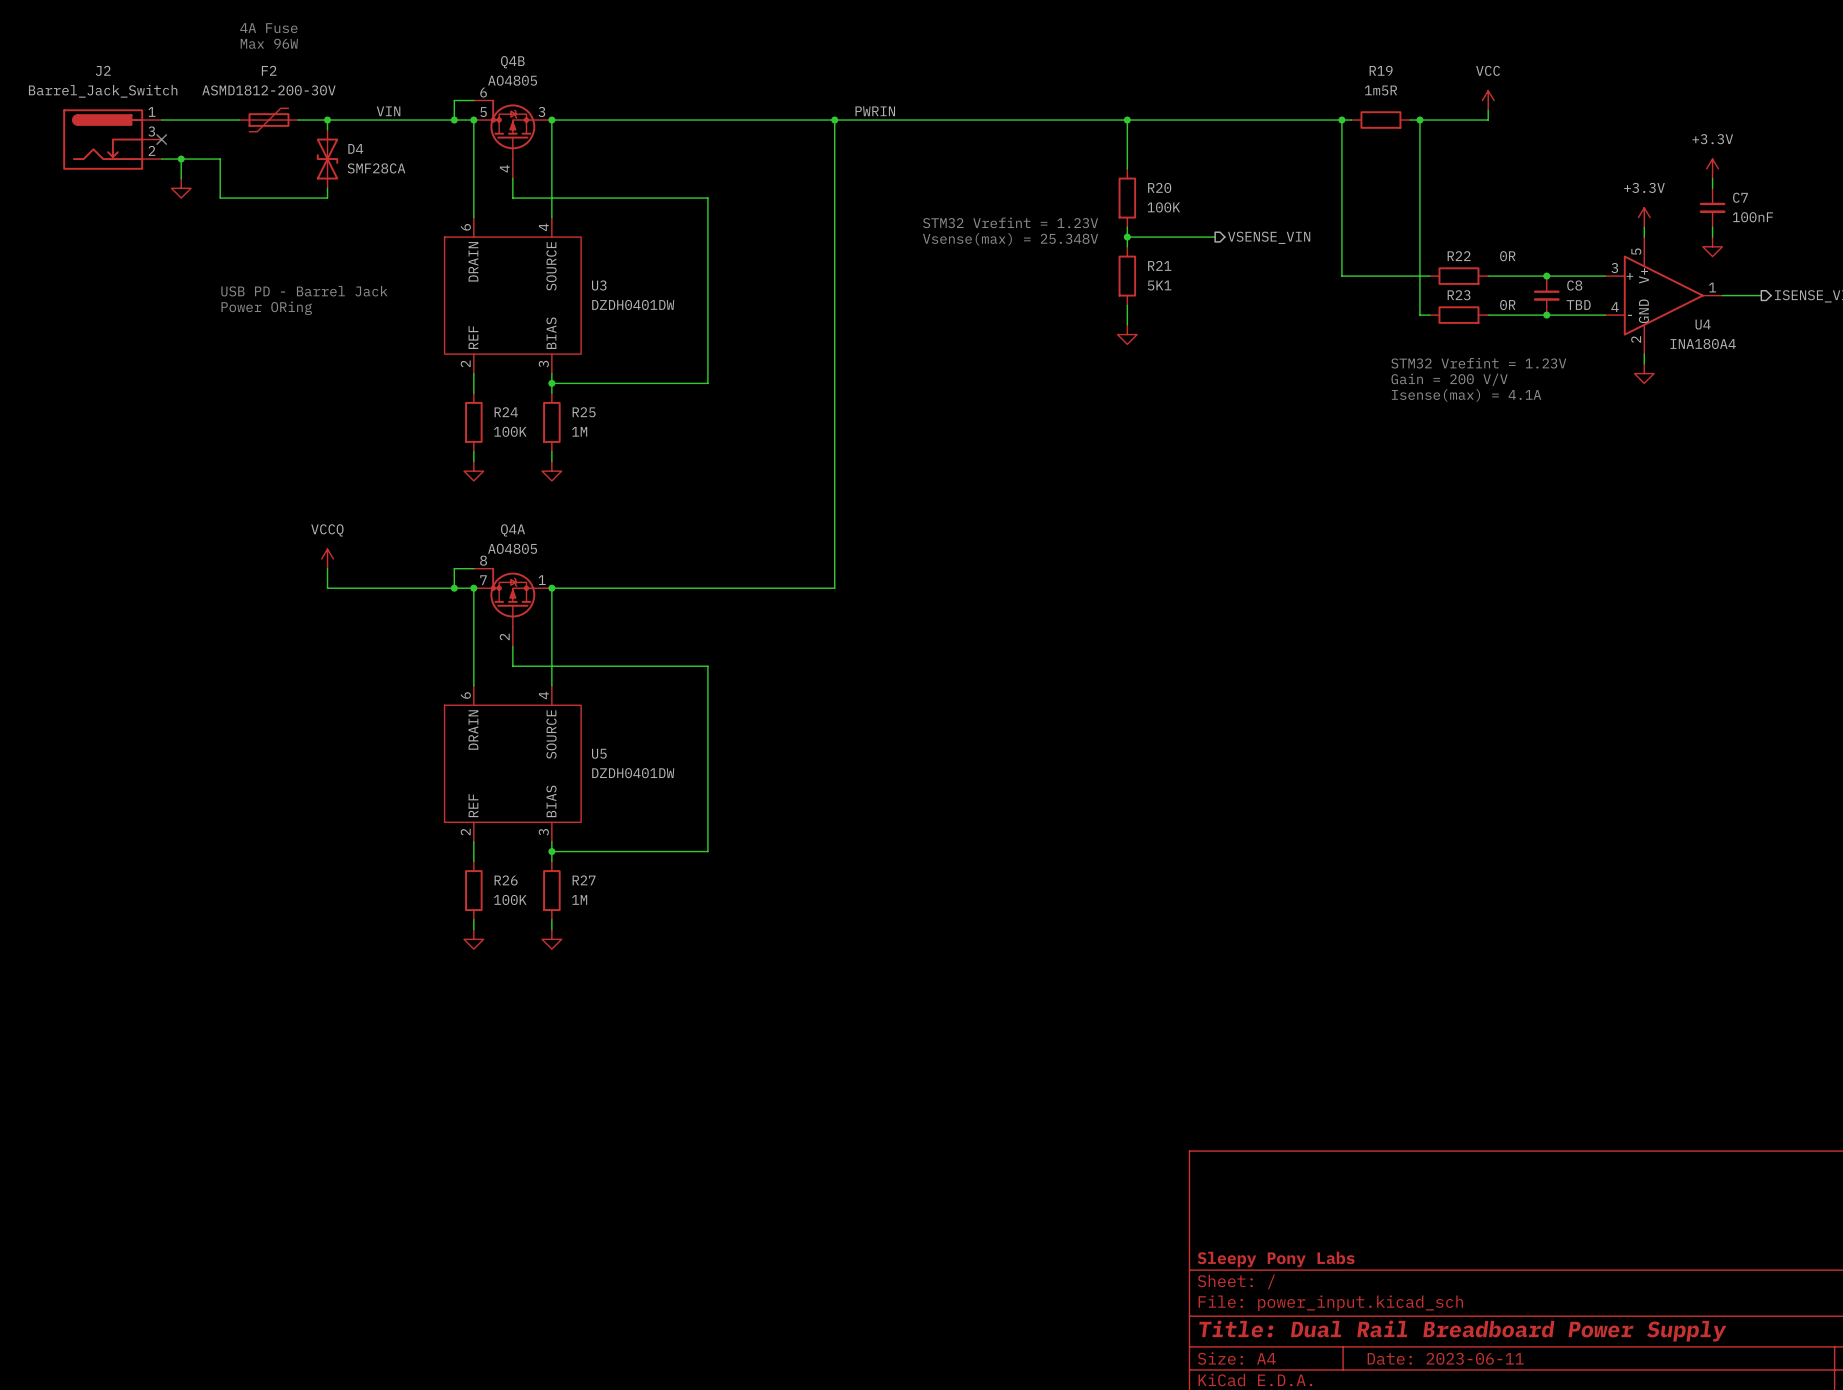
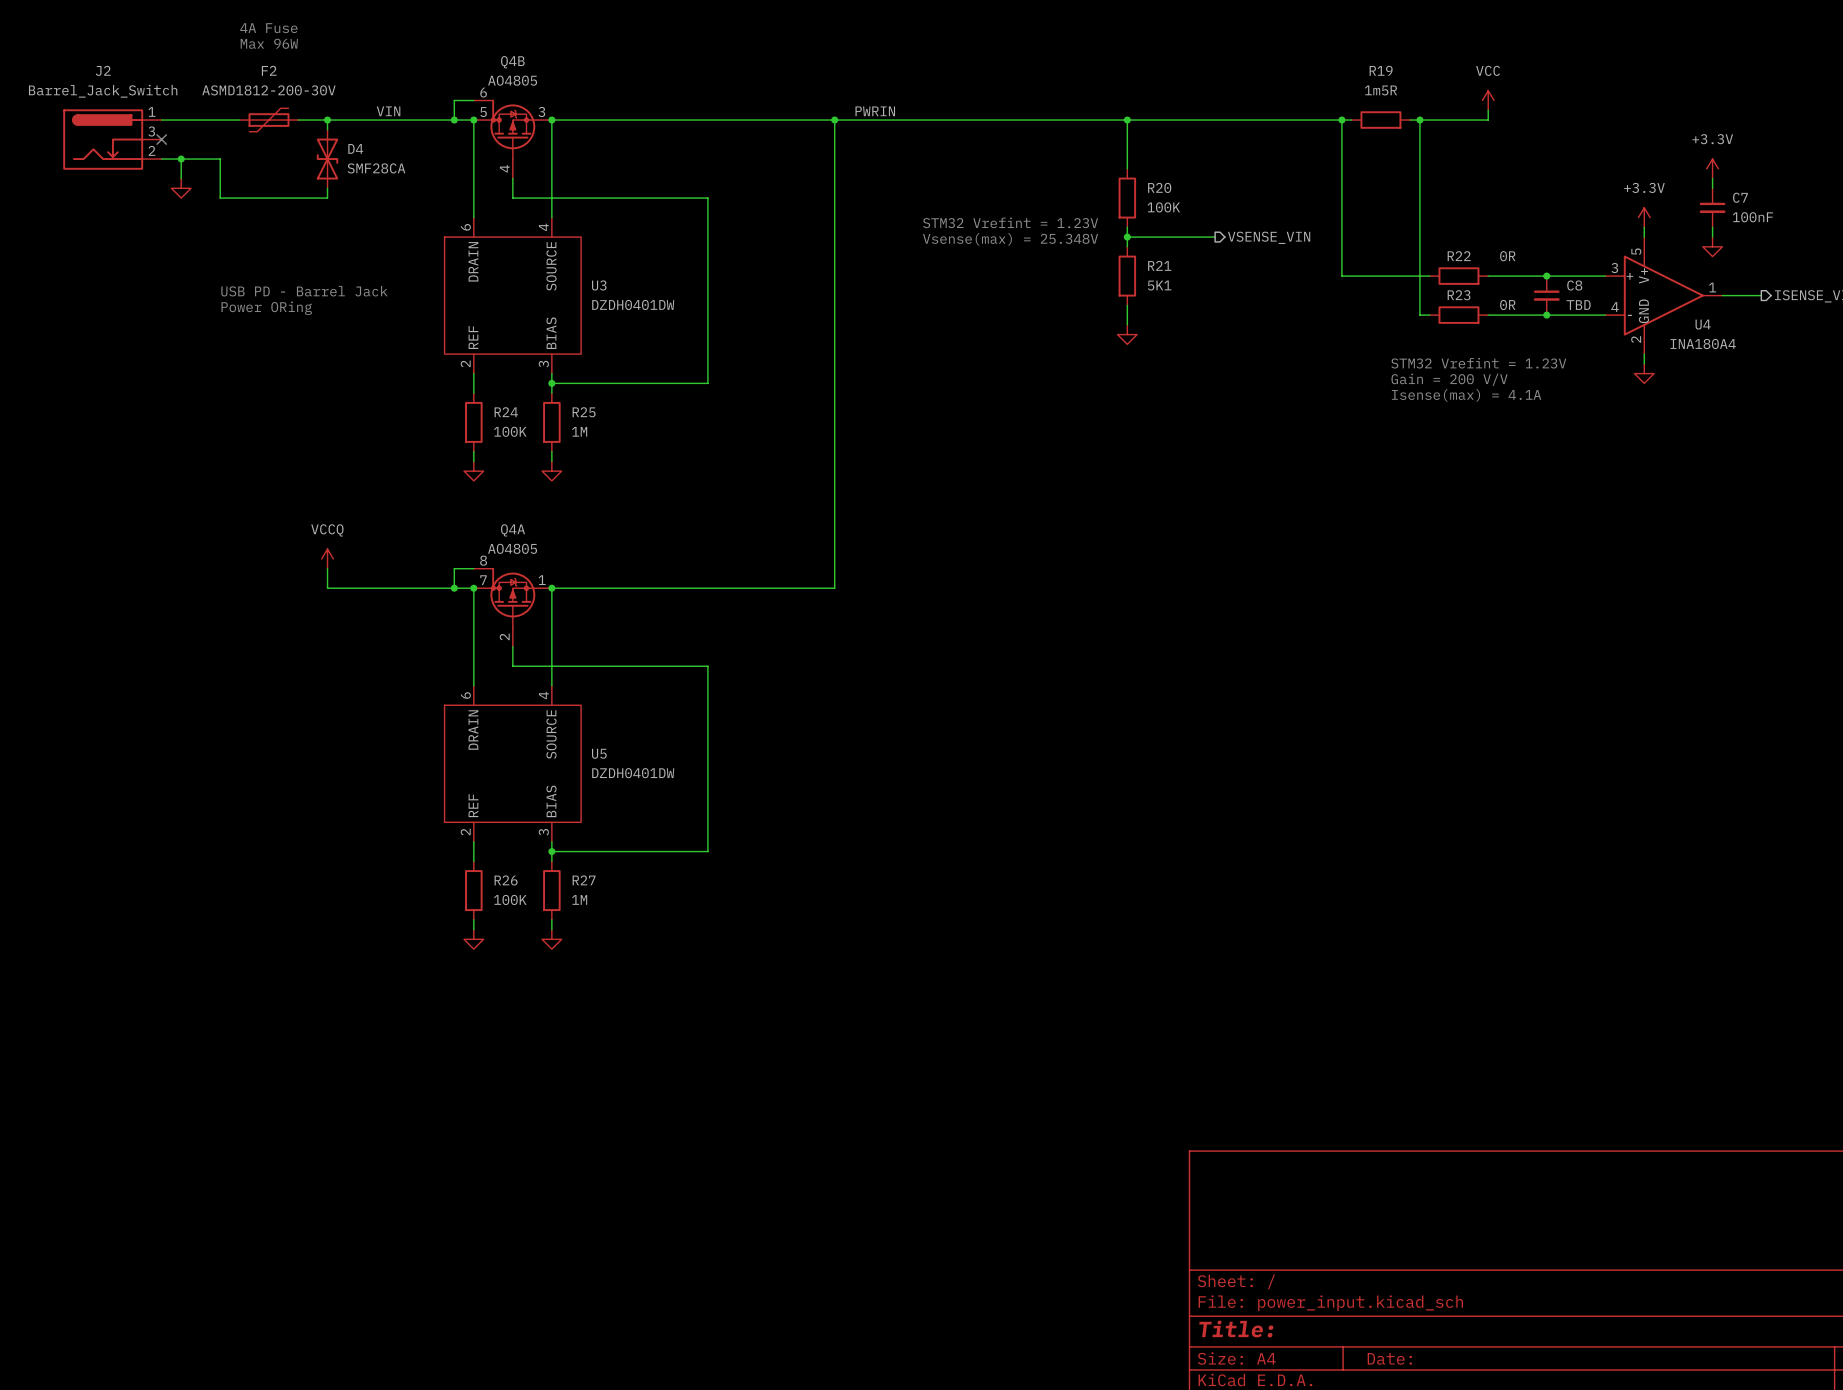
title block: Sleepy Pony Labs (1276, 1259) -> none
title block: Title: Dual Rail Breadboard Power Supply (1462, 1331) -> Title: (1236, 1329)
title block: Date: 2023-06-11 (1445, 1358) -> Date: (1389, 1358)

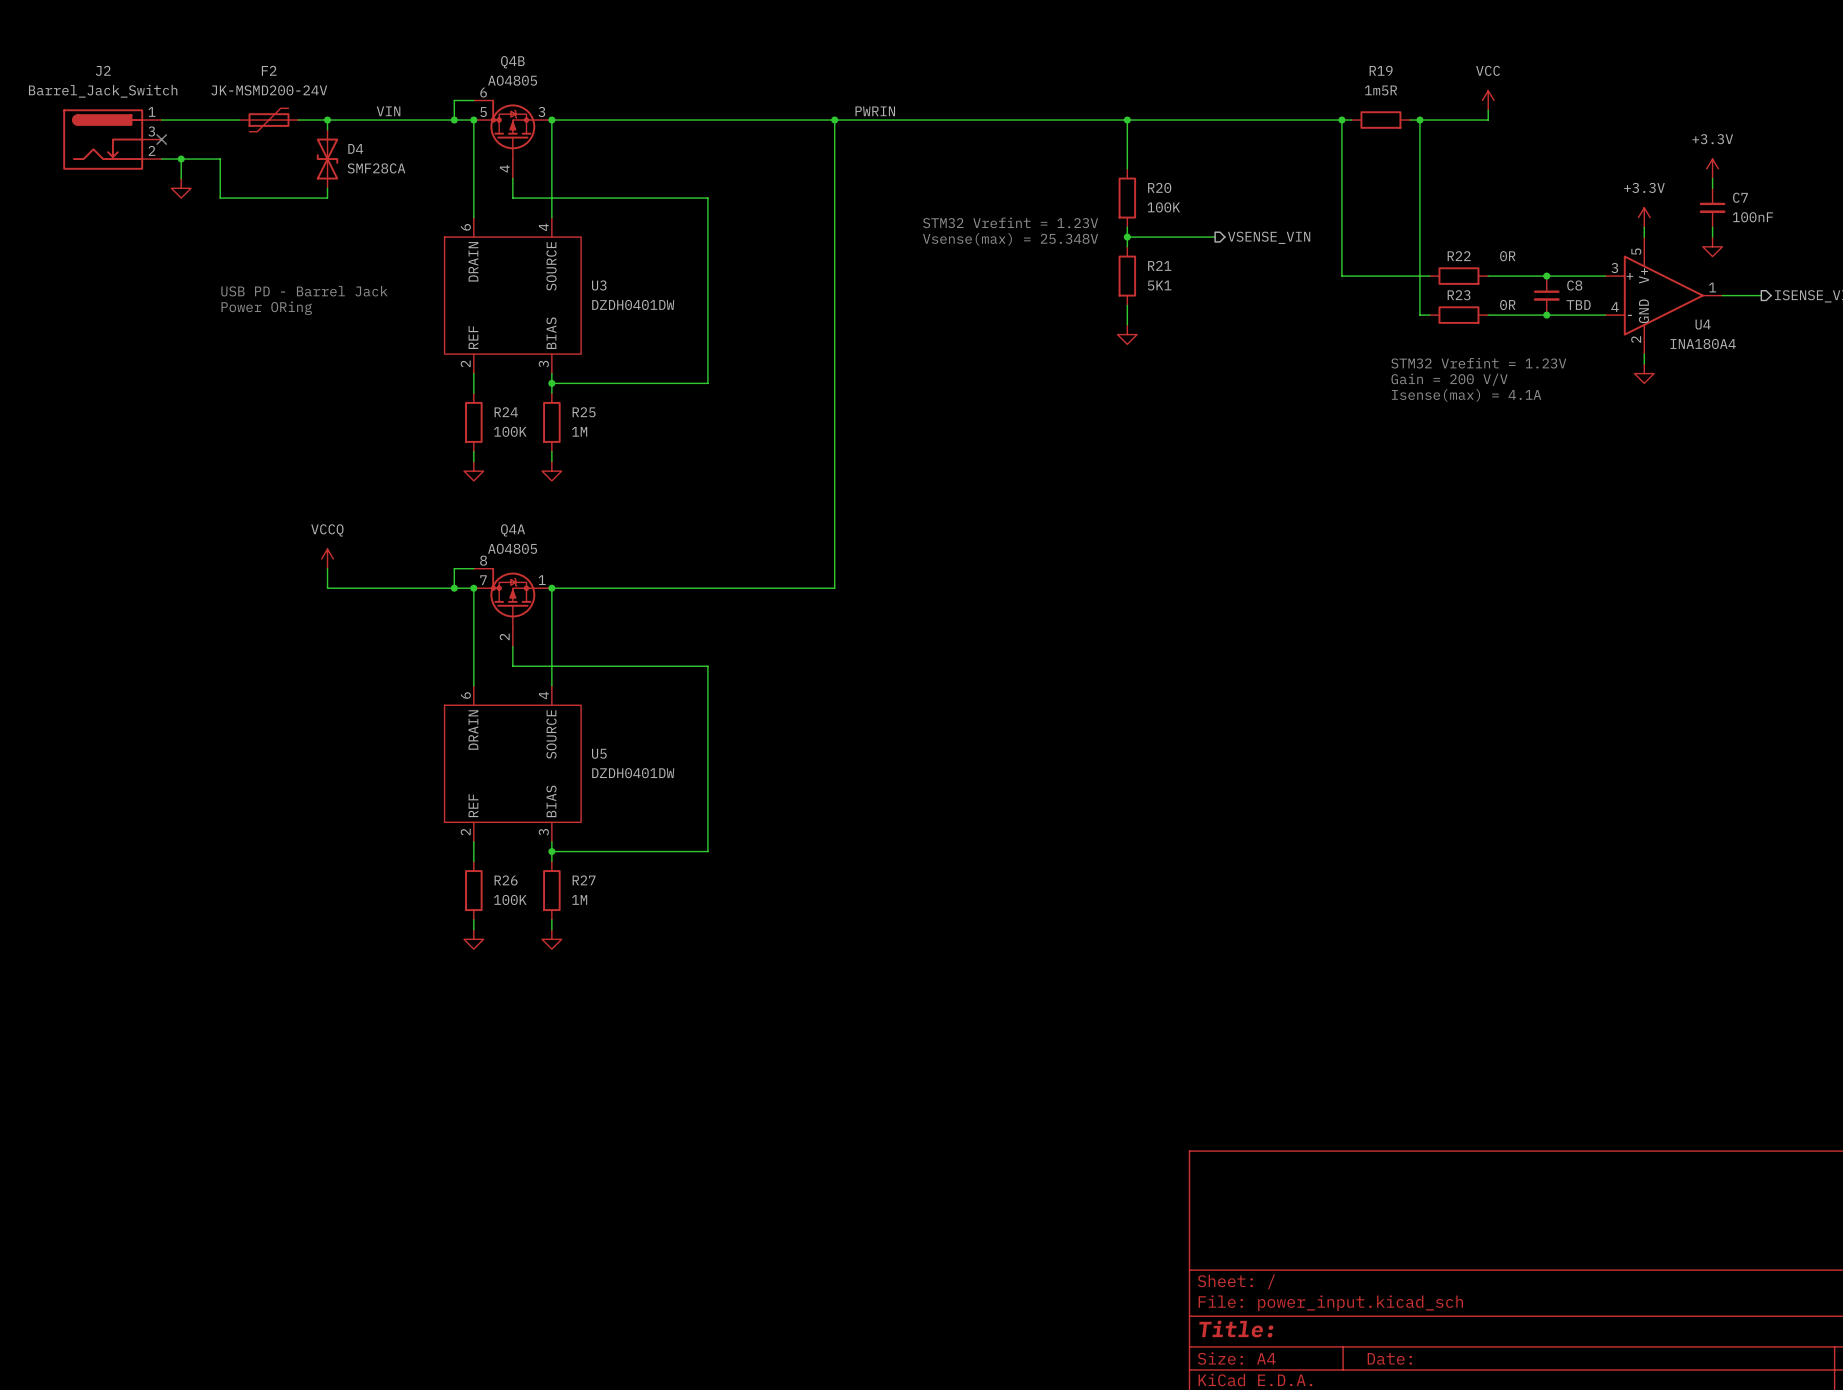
text: 4A Fuse (268, 28) -> none
text: Max 96W (269, 43) -> none
F2 value: ASMD1812-200-30V (268, 90) -> JK-MSMD200-24V (269, 90)

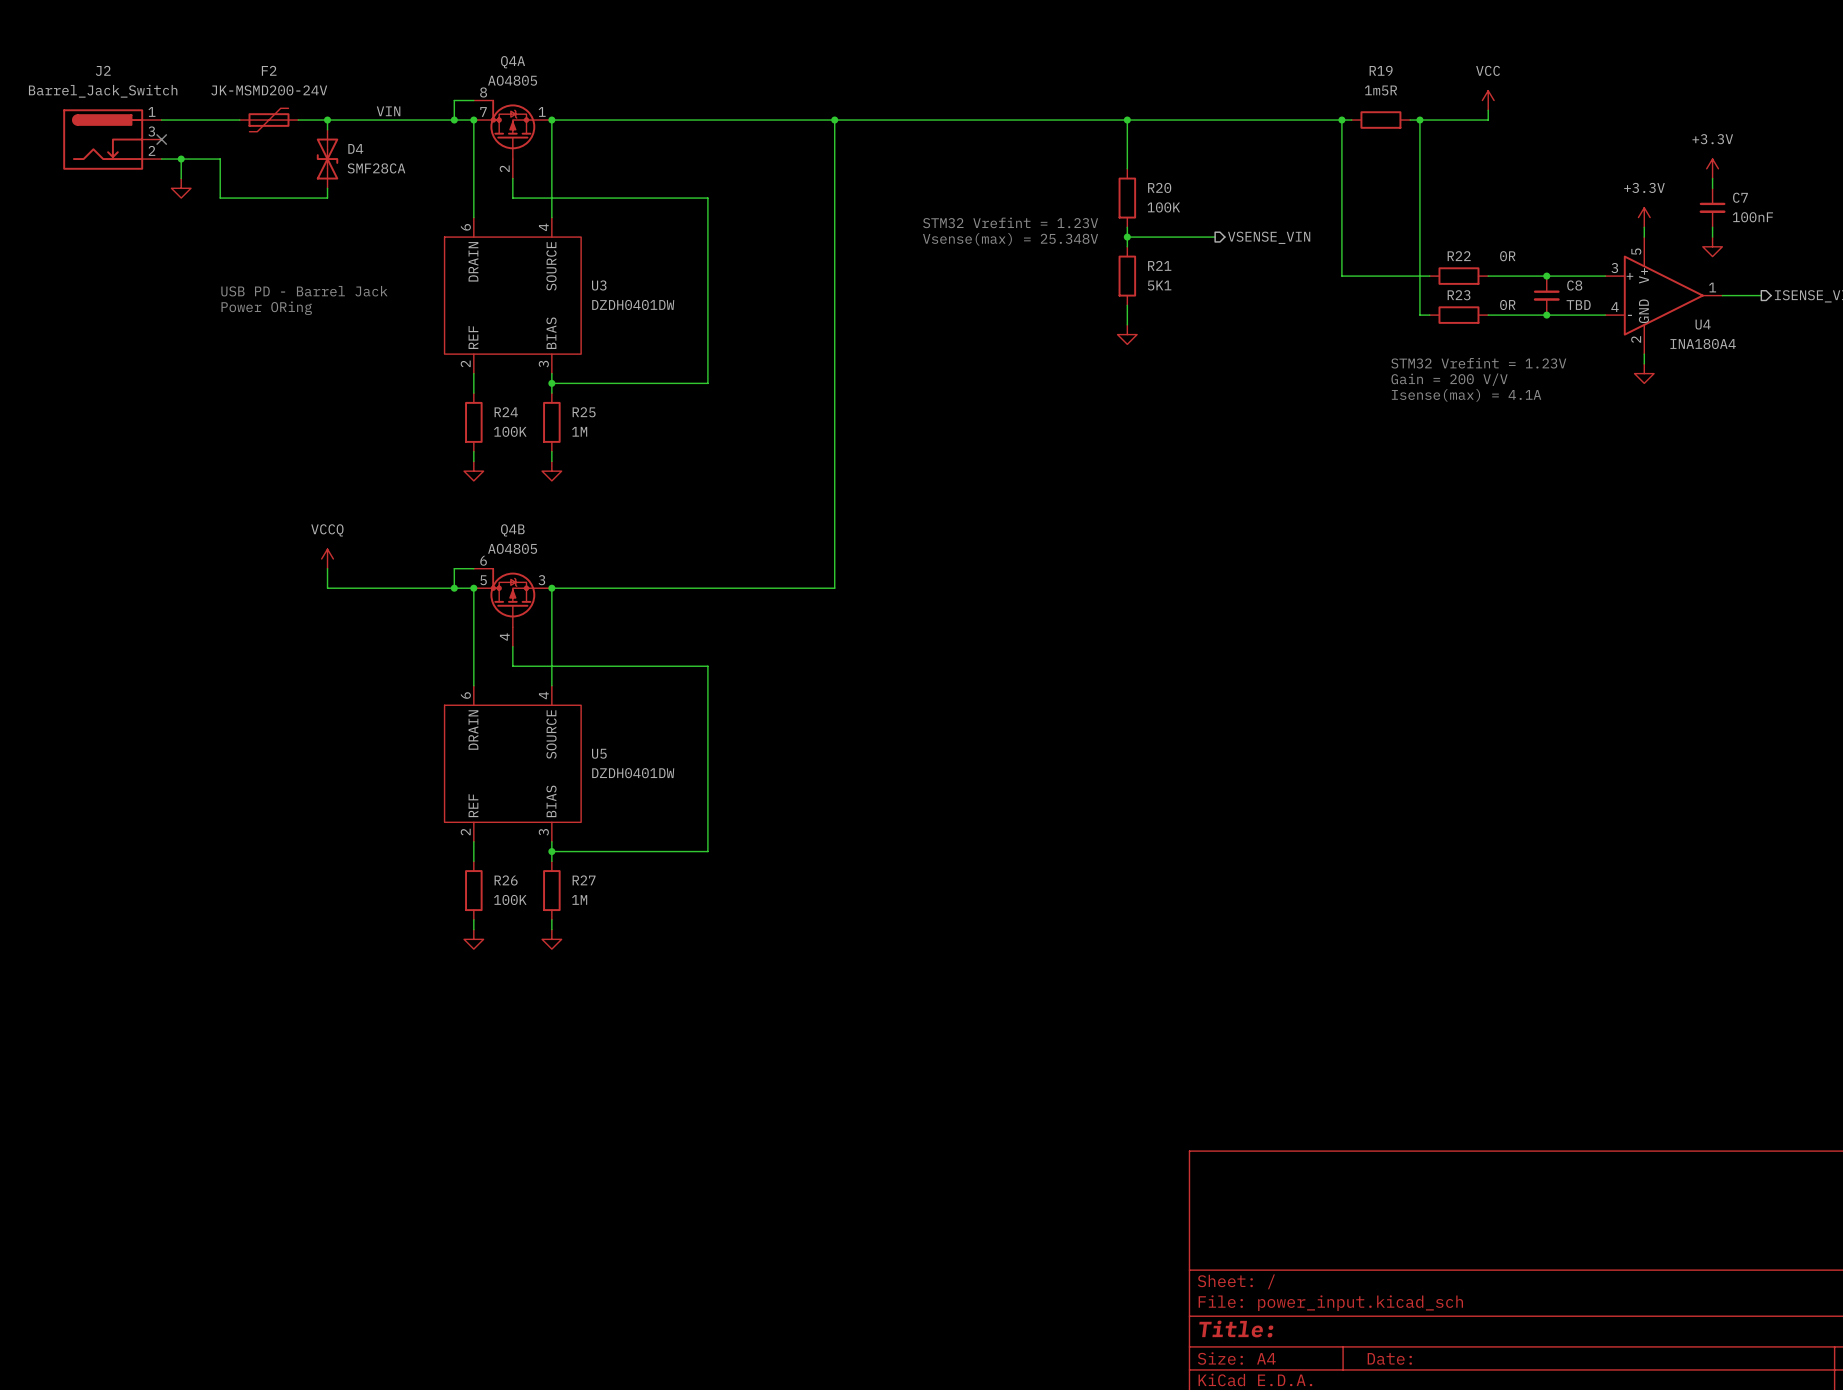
label: PWRIN (875, 111) -> none
Q4B position: (512, 139) -> (512, 607)
Q4A position: (512, 607) -> (512, 139)

